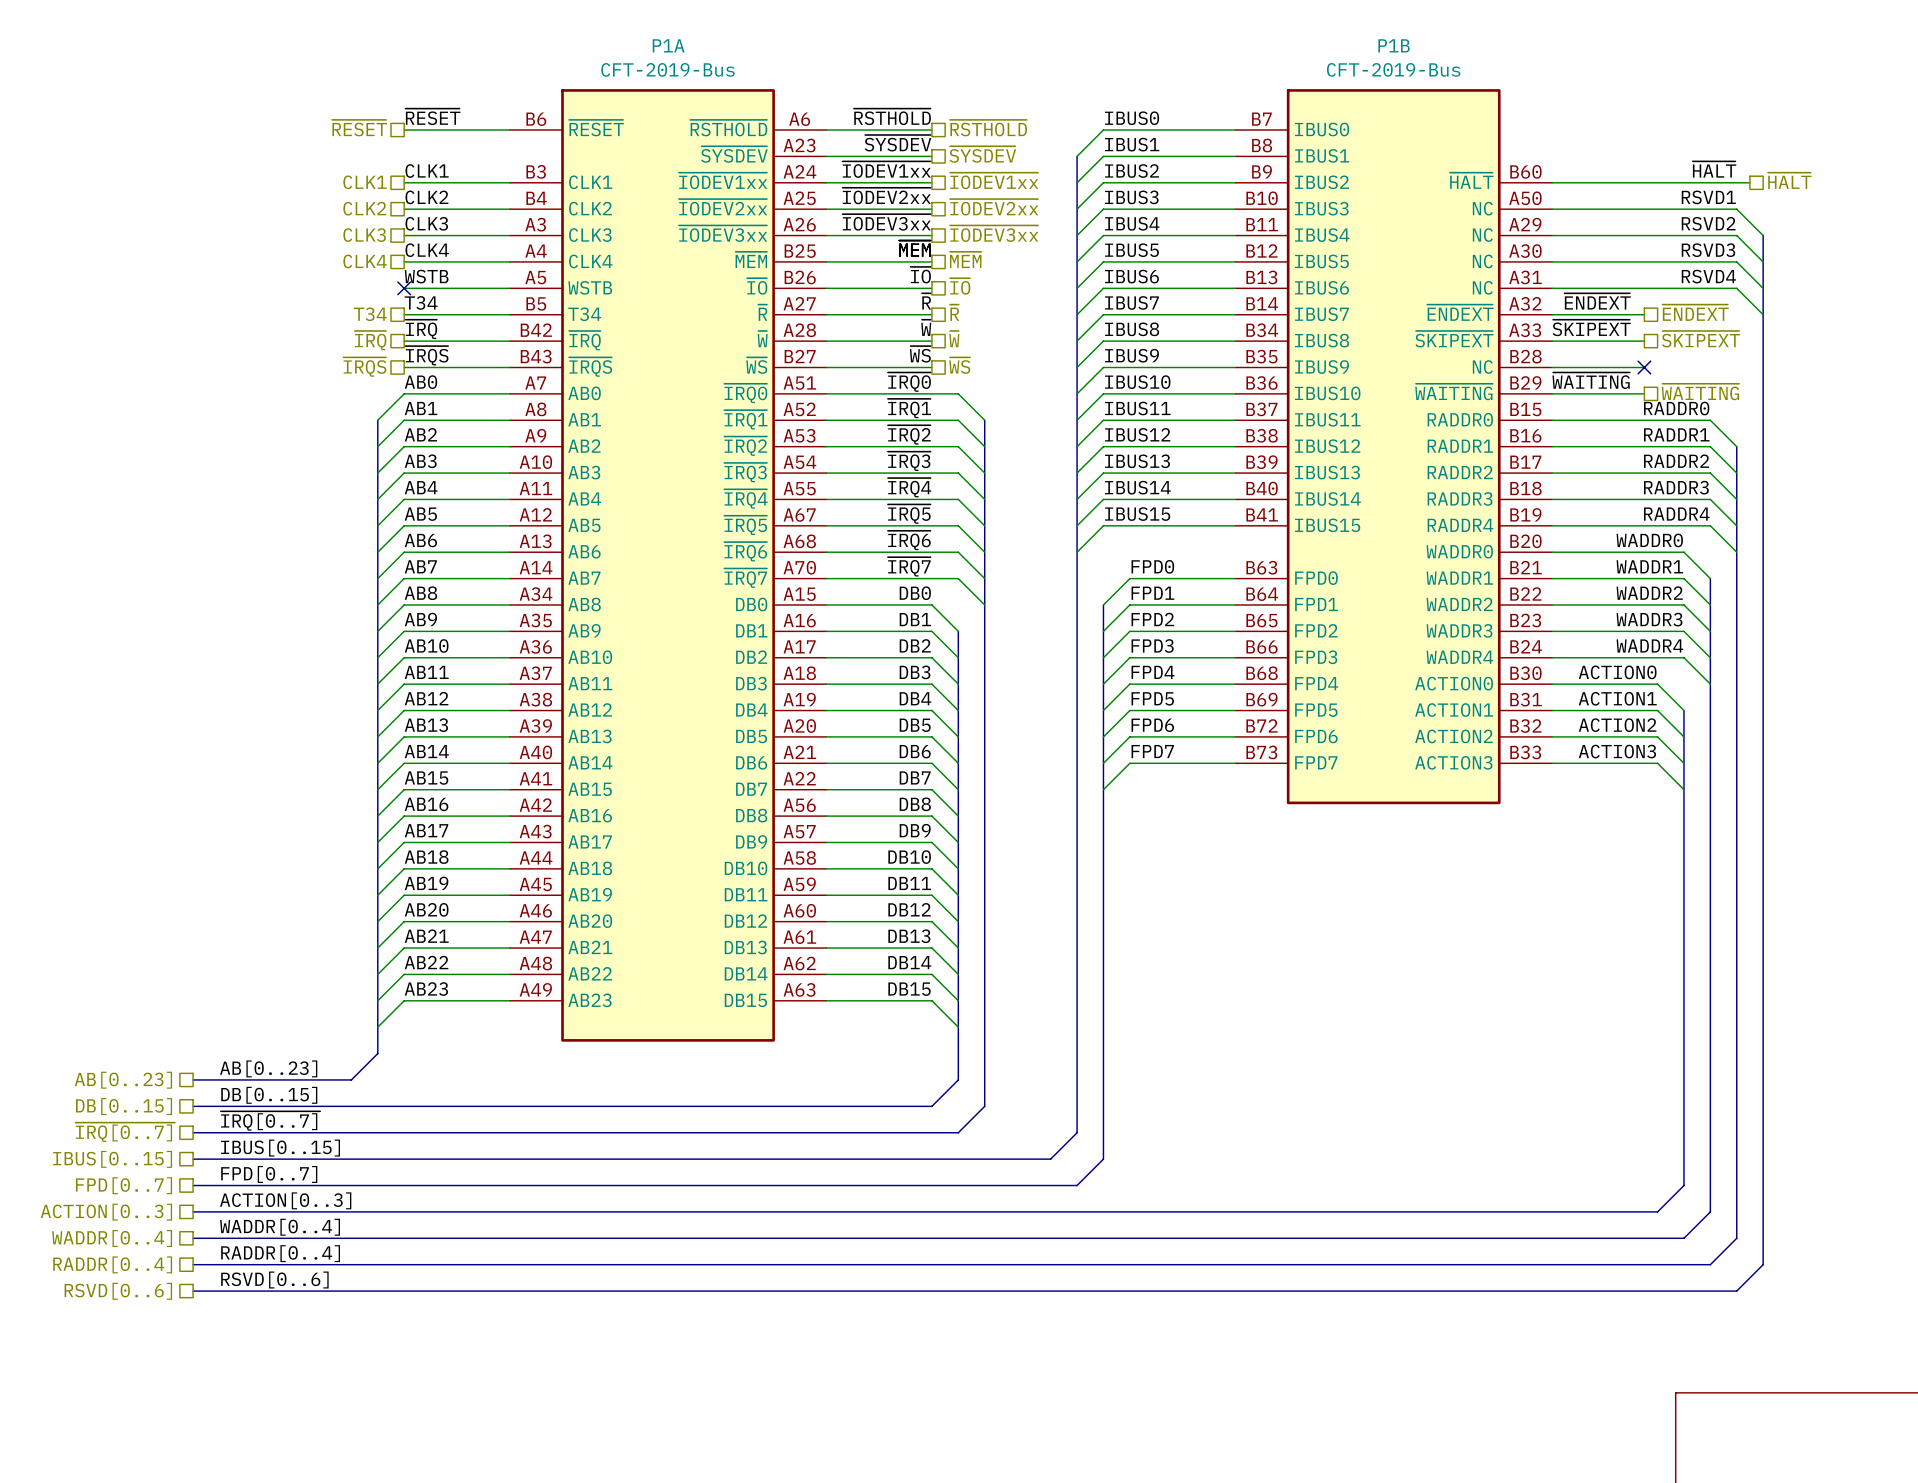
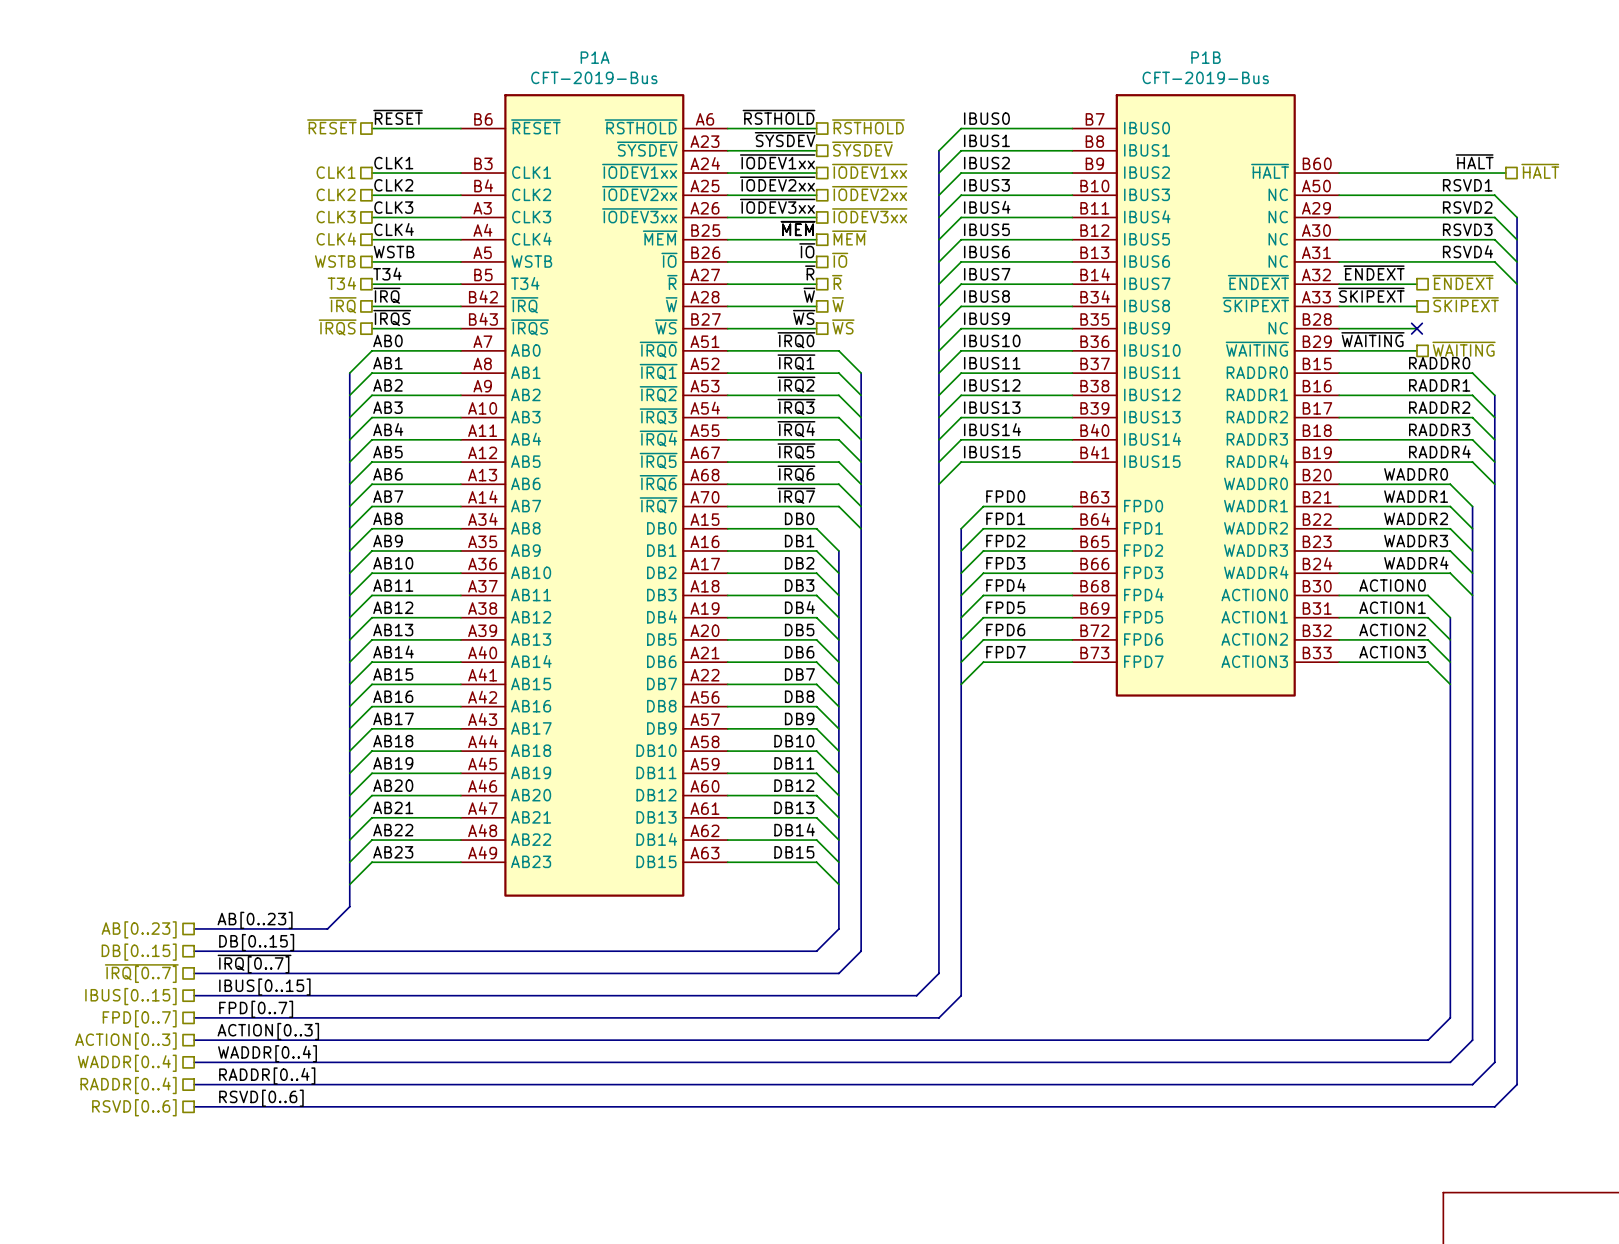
hierarchical label: none -> WSTB (335, 261)
no-connect mark: (404, 288) -> none

